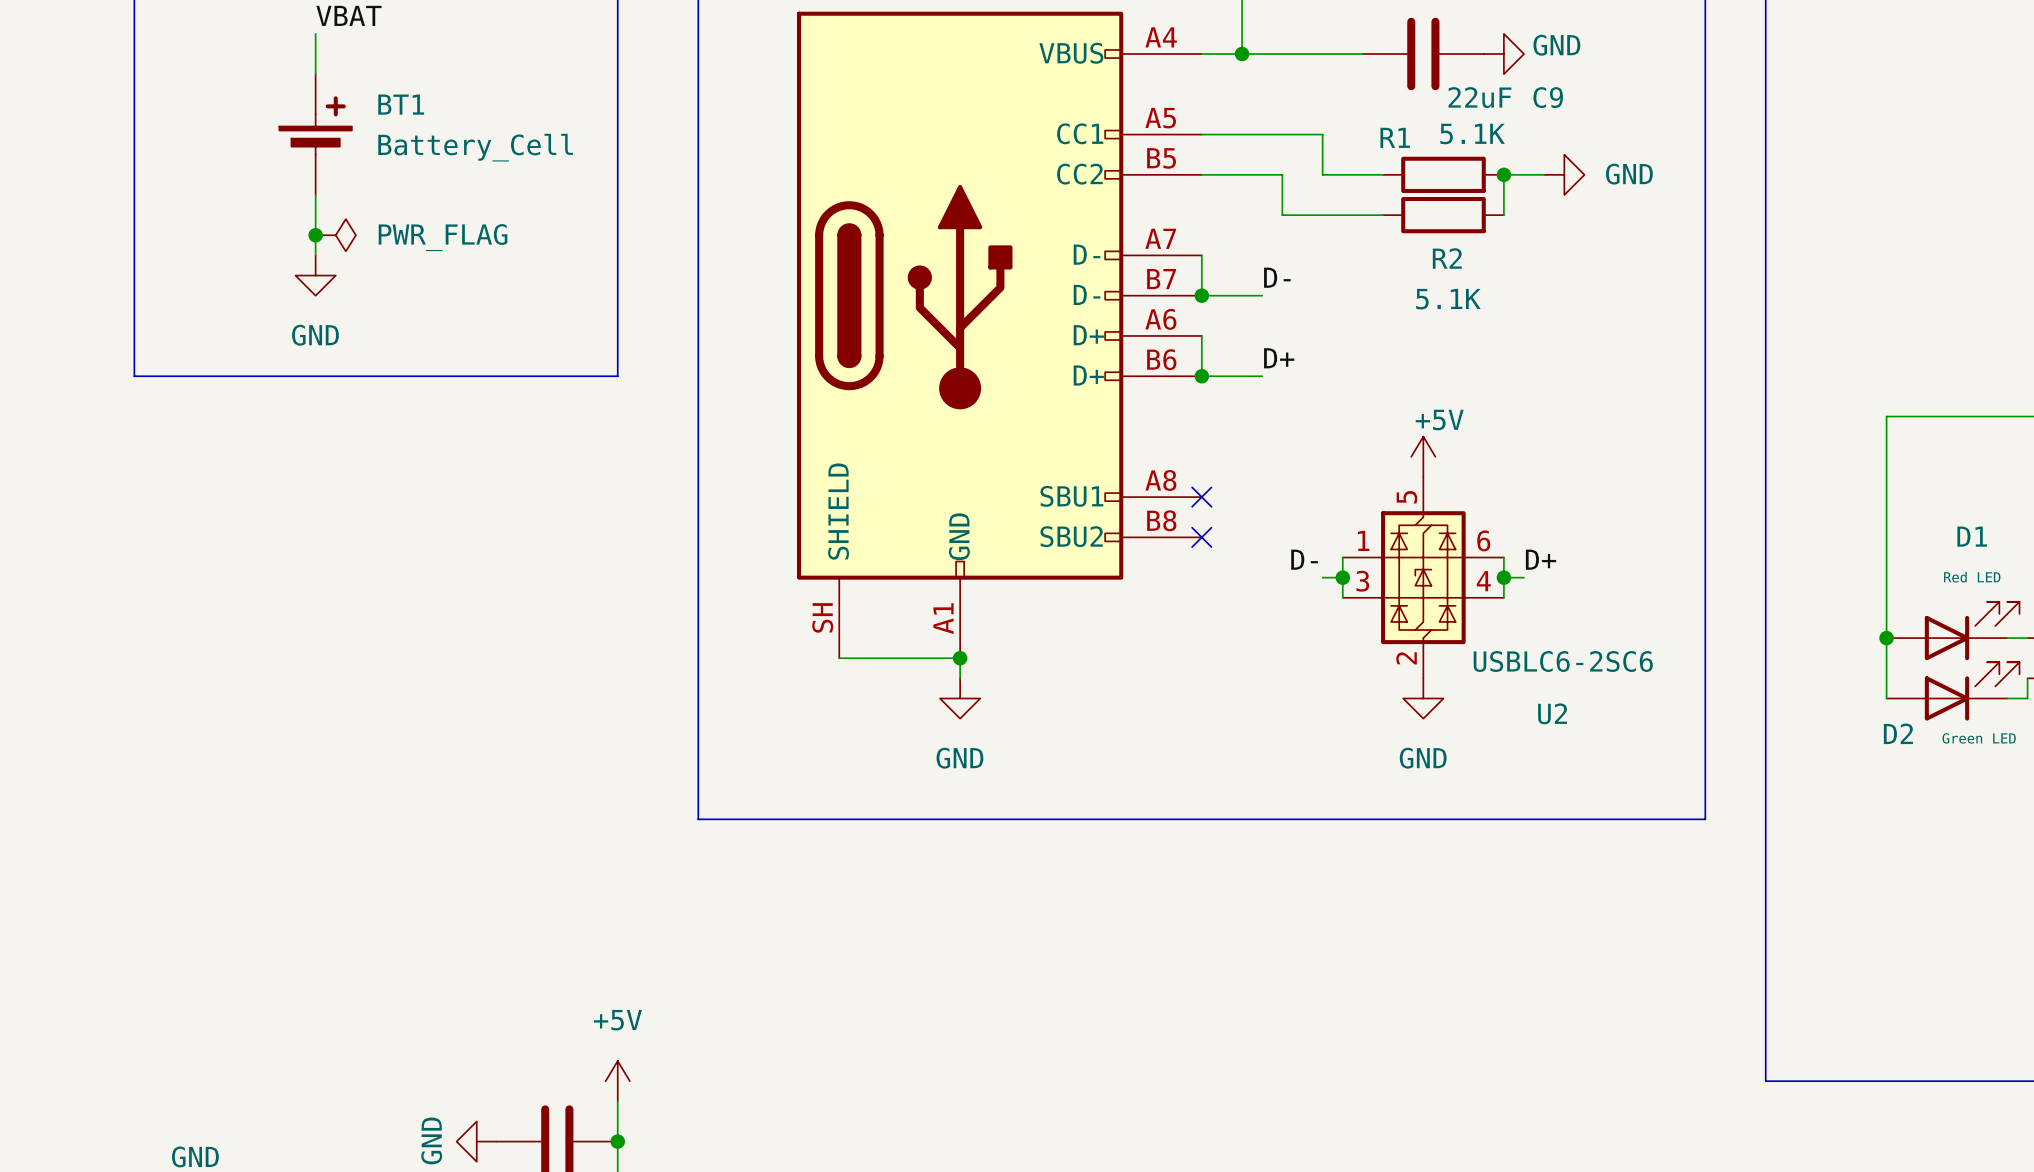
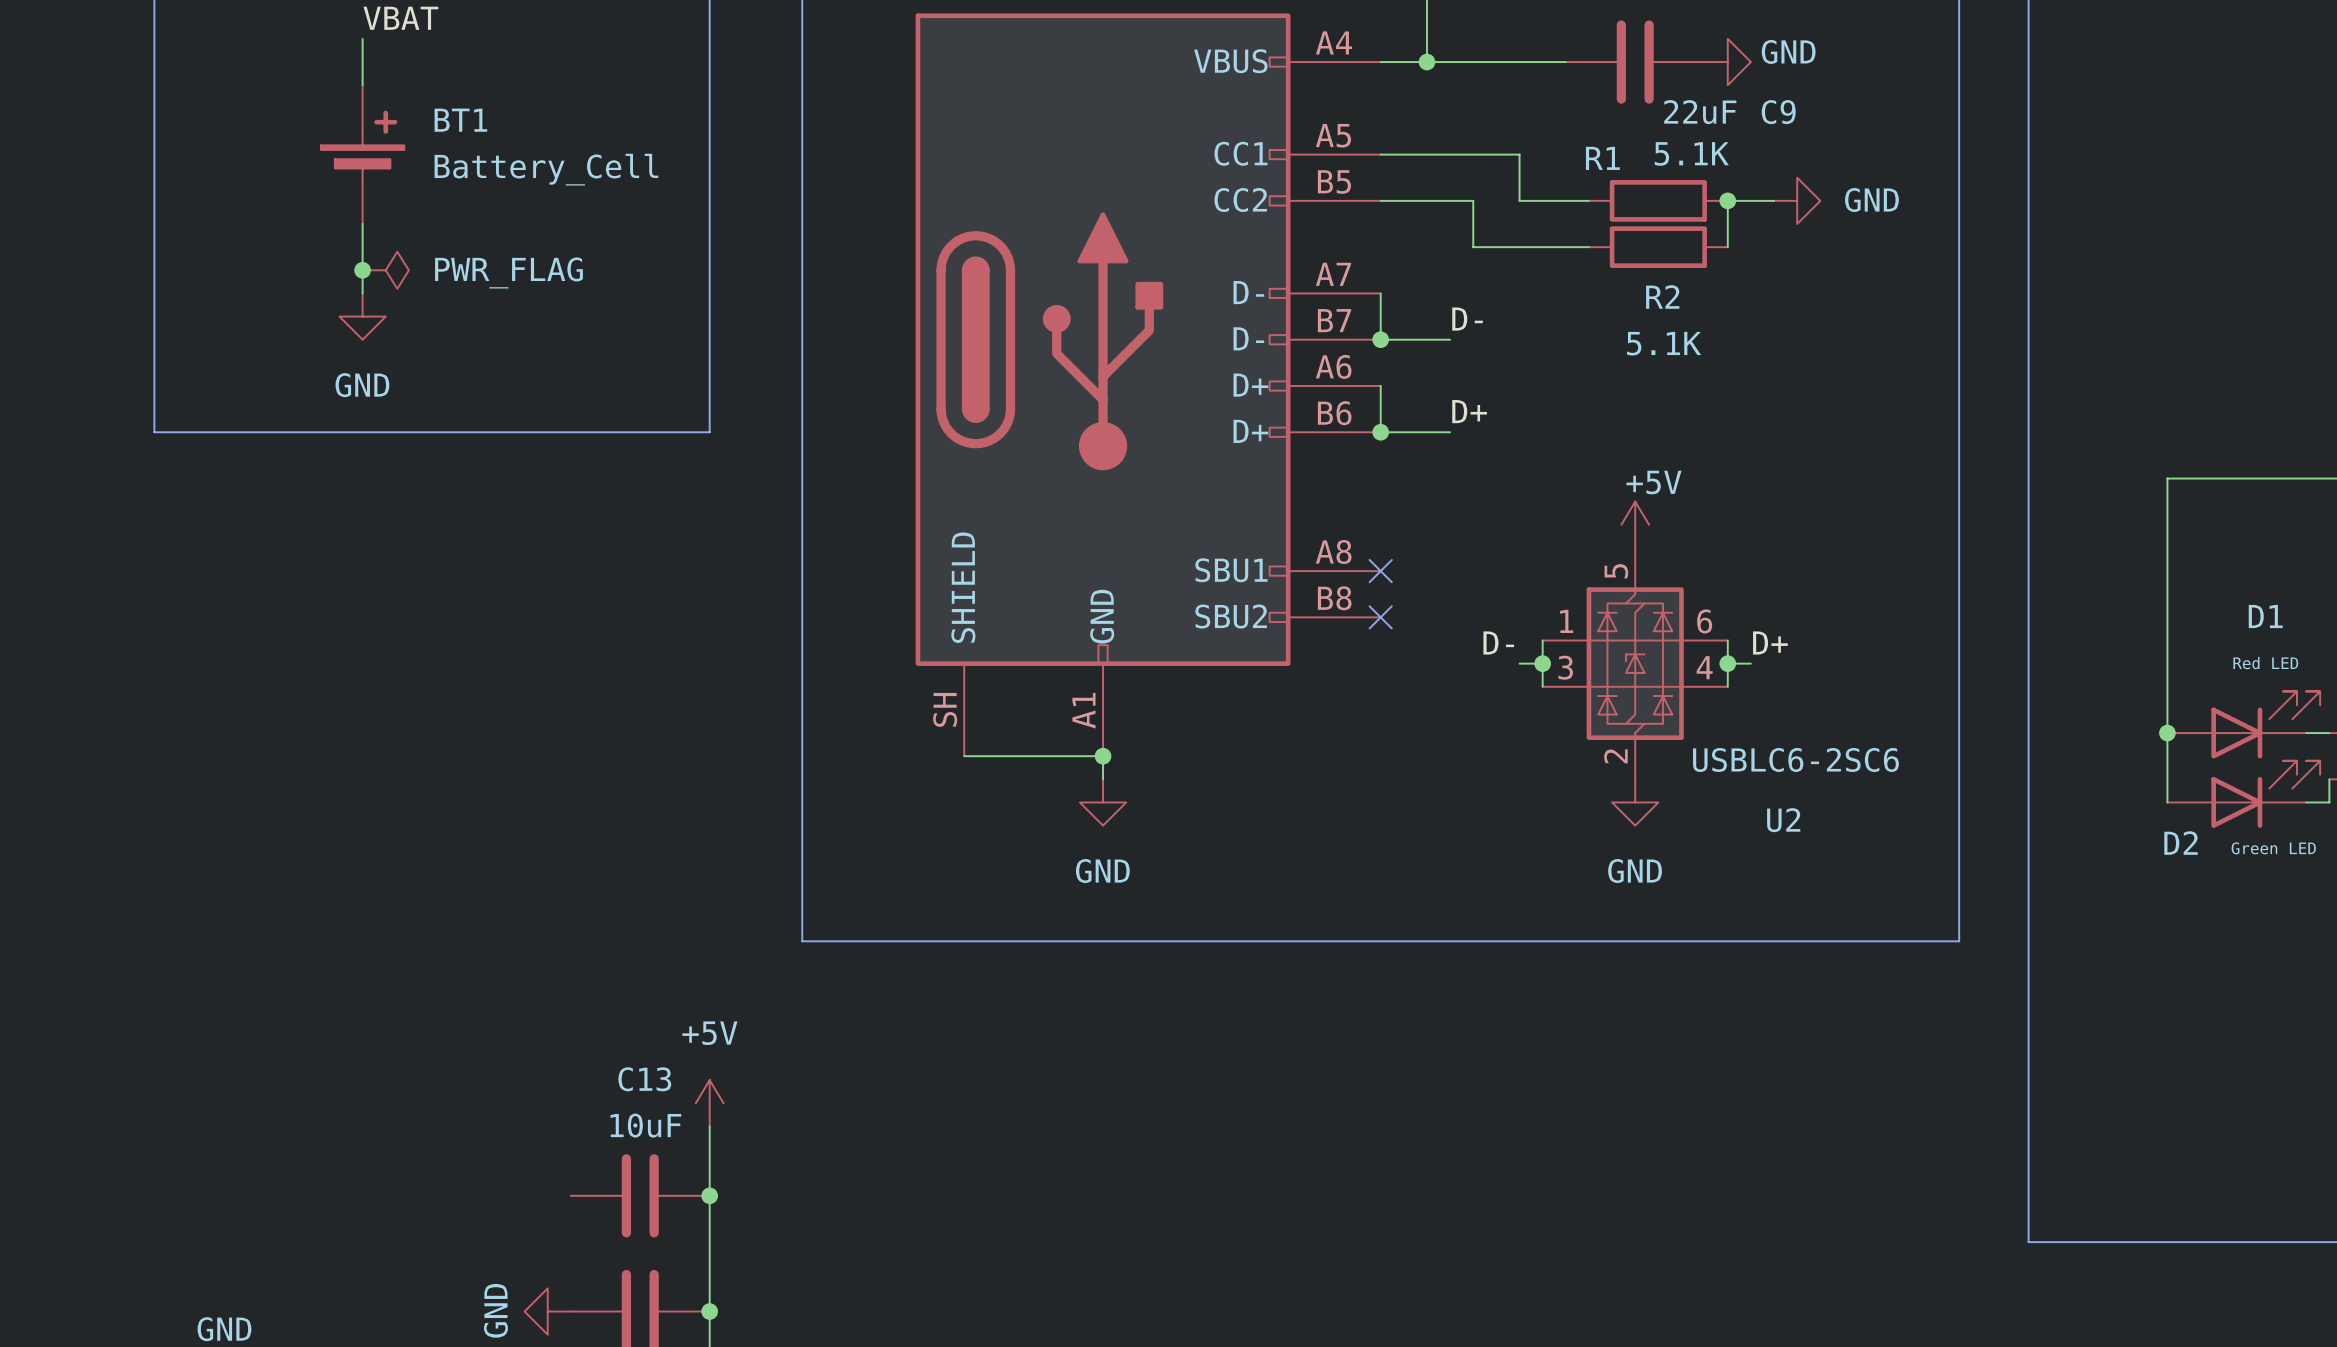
wire: none -> (709, 1126) (709, 1265)
C13: none -> 10uF (640, 1195)
junction: none -> (709, 1195)
power symbol position: +5V (617, 1081) -> +5V (709, 1103)

